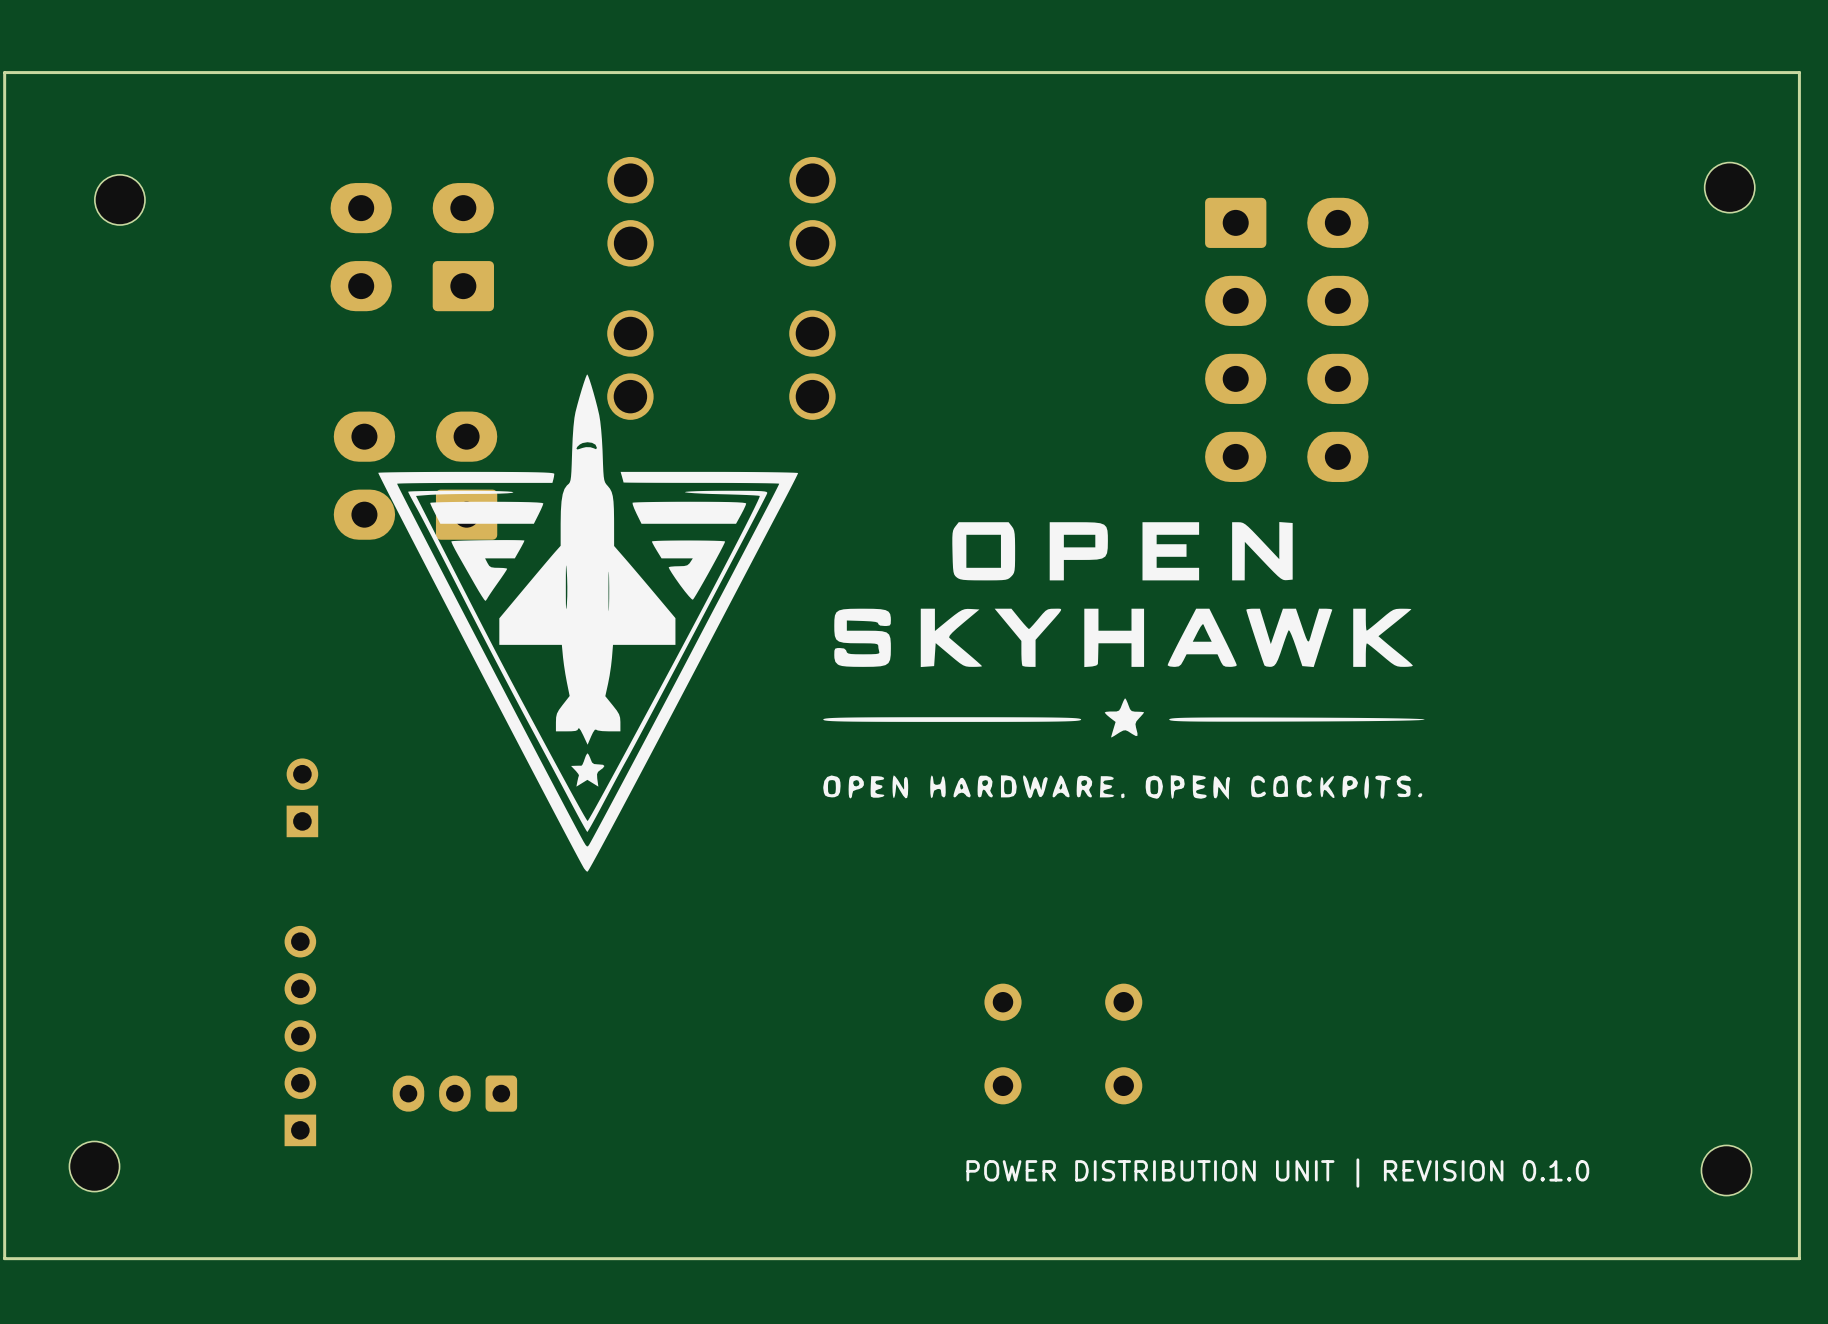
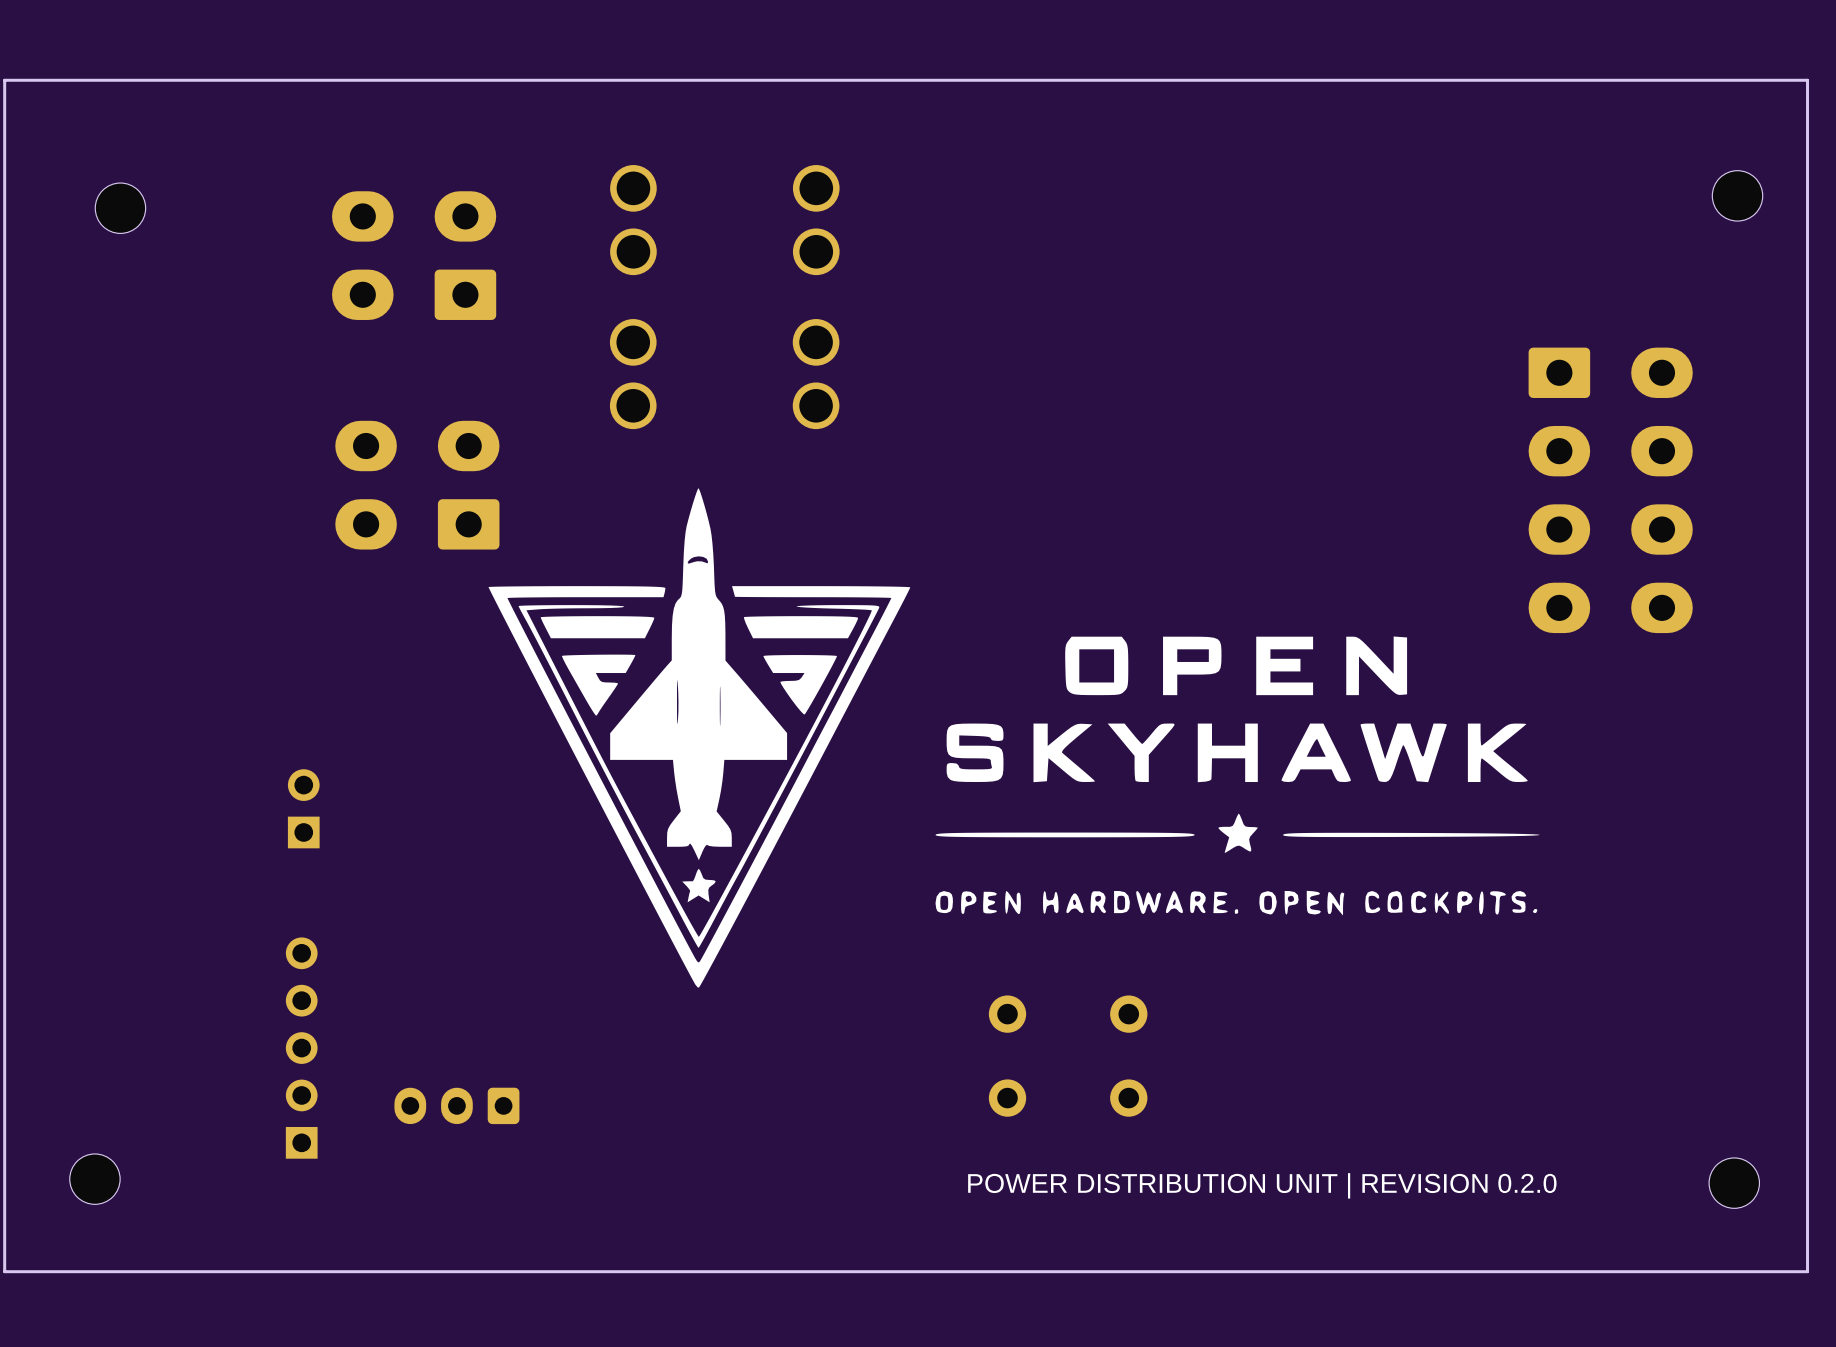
part position: (1286, 339) -> (1610, 490)
drawing position: (901, 623) -> (1014, 737)
text: POWER DISTRIBUTION UNIT | REVISION 0.1.0 (1277, 1173) -> POWER DISTRIBUTION UNIT | REVISION 0.2.0 (1262, 1185)

